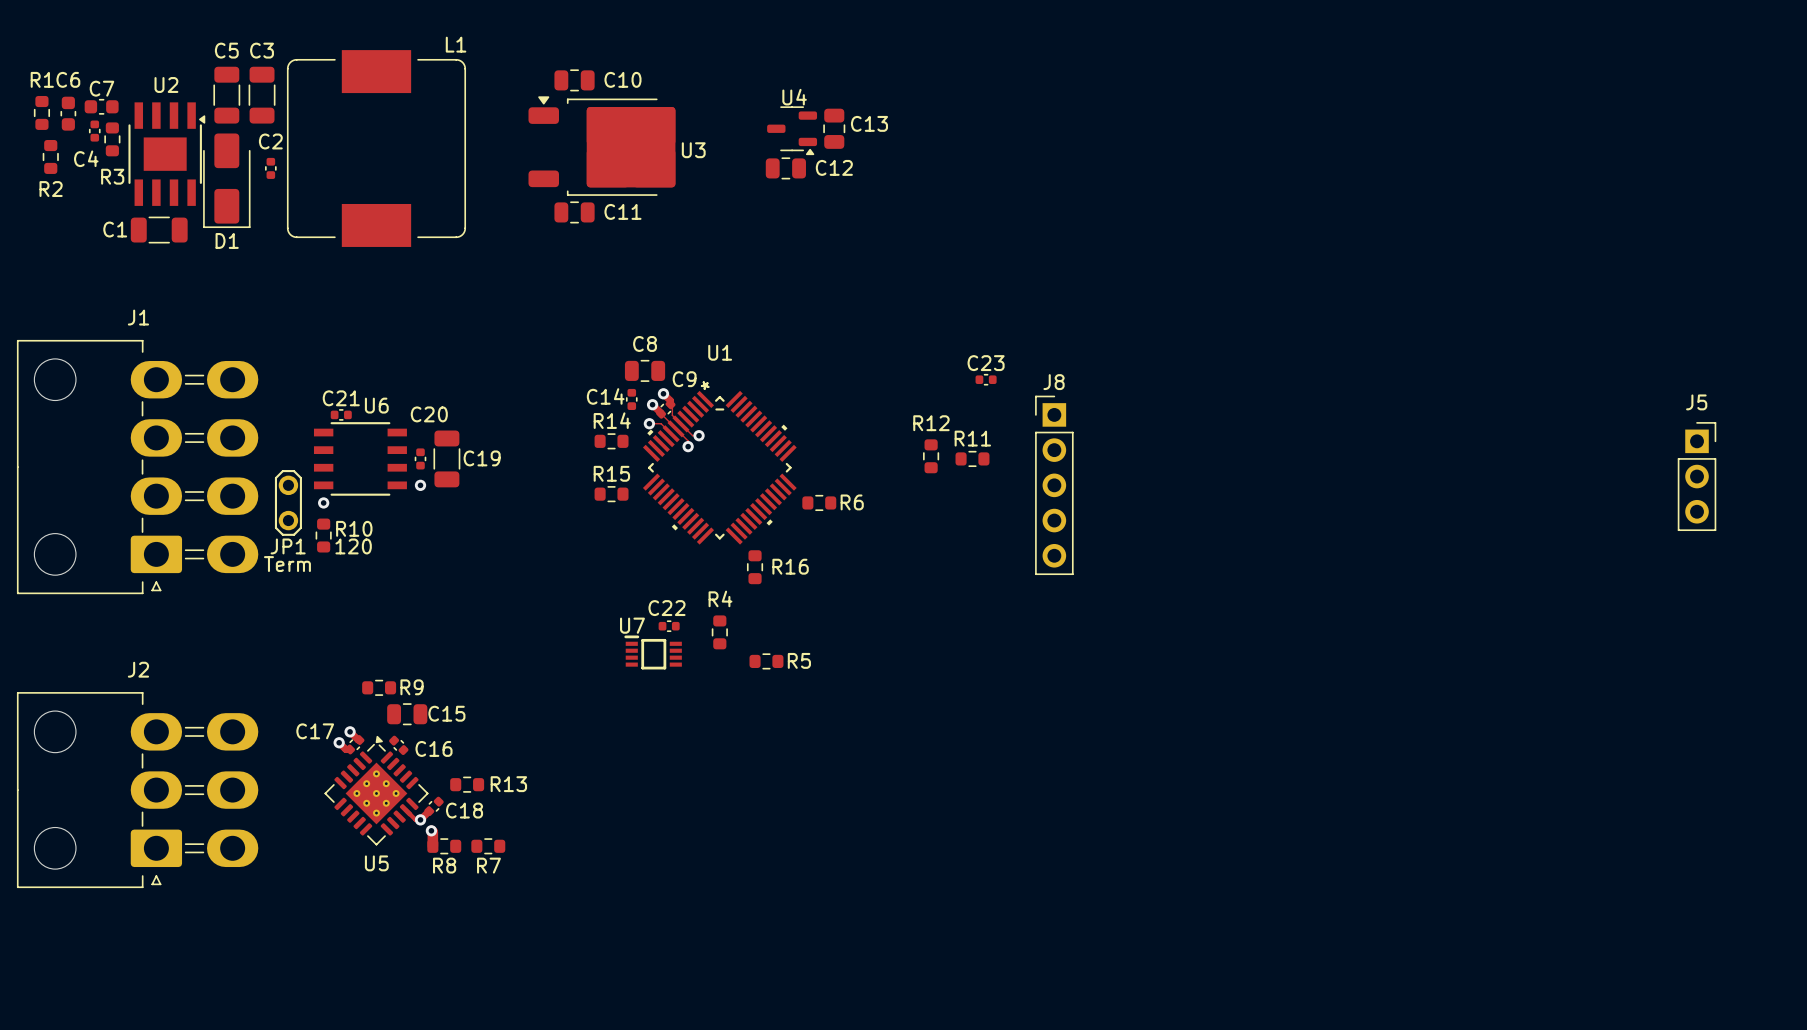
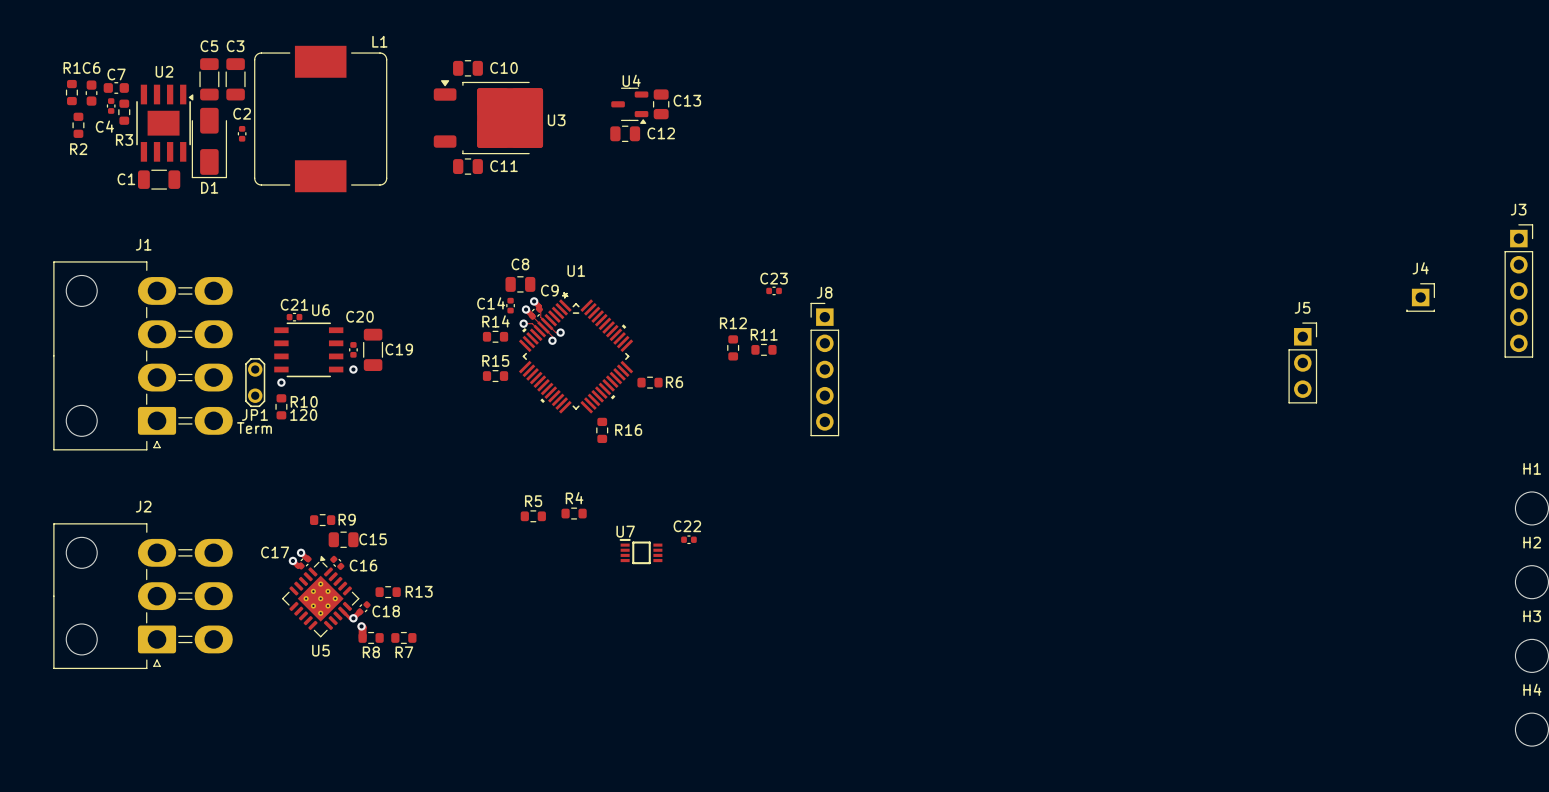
C22 position: (669, 626) -> (688, 539)
R4 rotation: 0° (719, 632) -> 90° clockwise (574, 513)
R4 position: (719, 632) -> (574, 513)
U7 position: (653, 652) -> (641, 551)
R5 name position: R5 (799, 660) -> R5 (533, 501)
R5 position: (766, 661) -> (533, 516)

